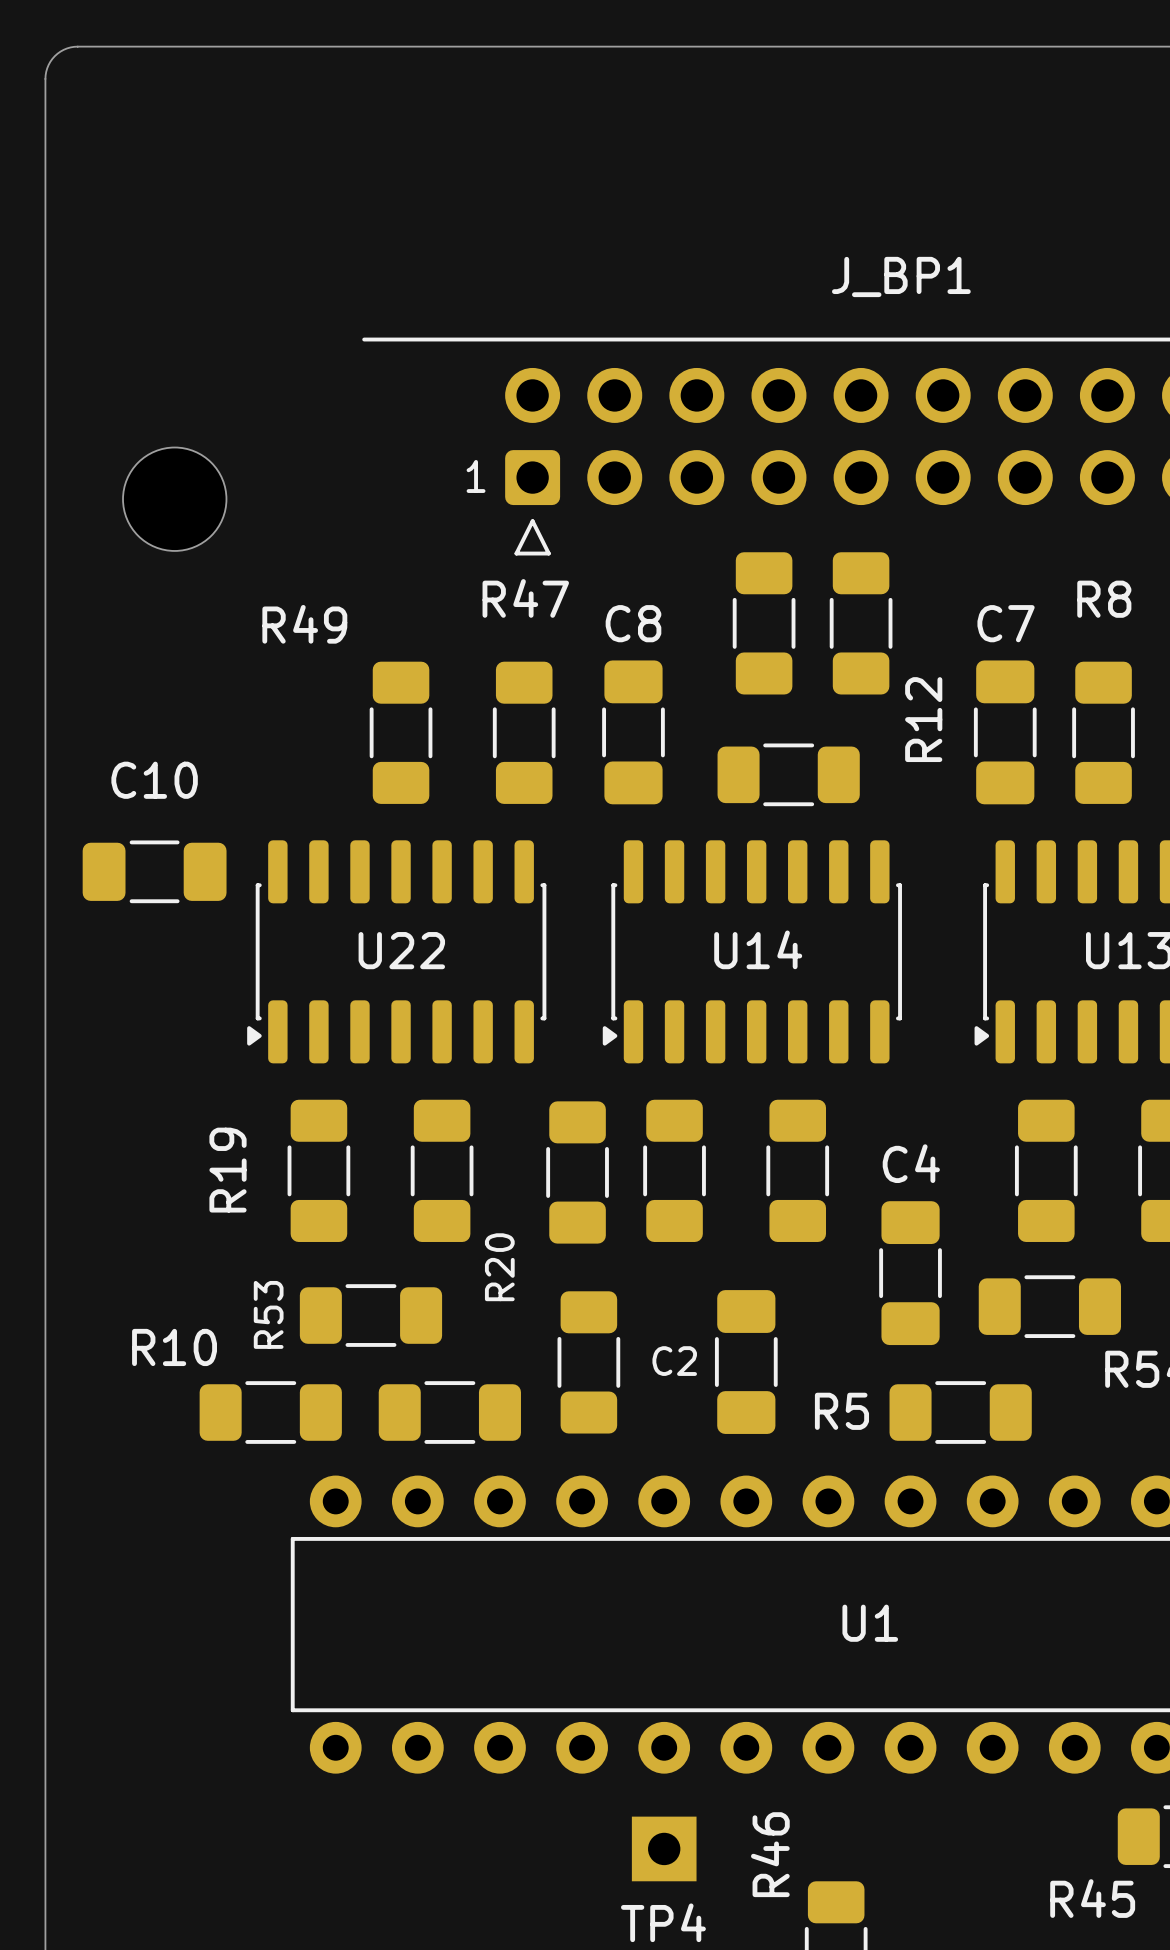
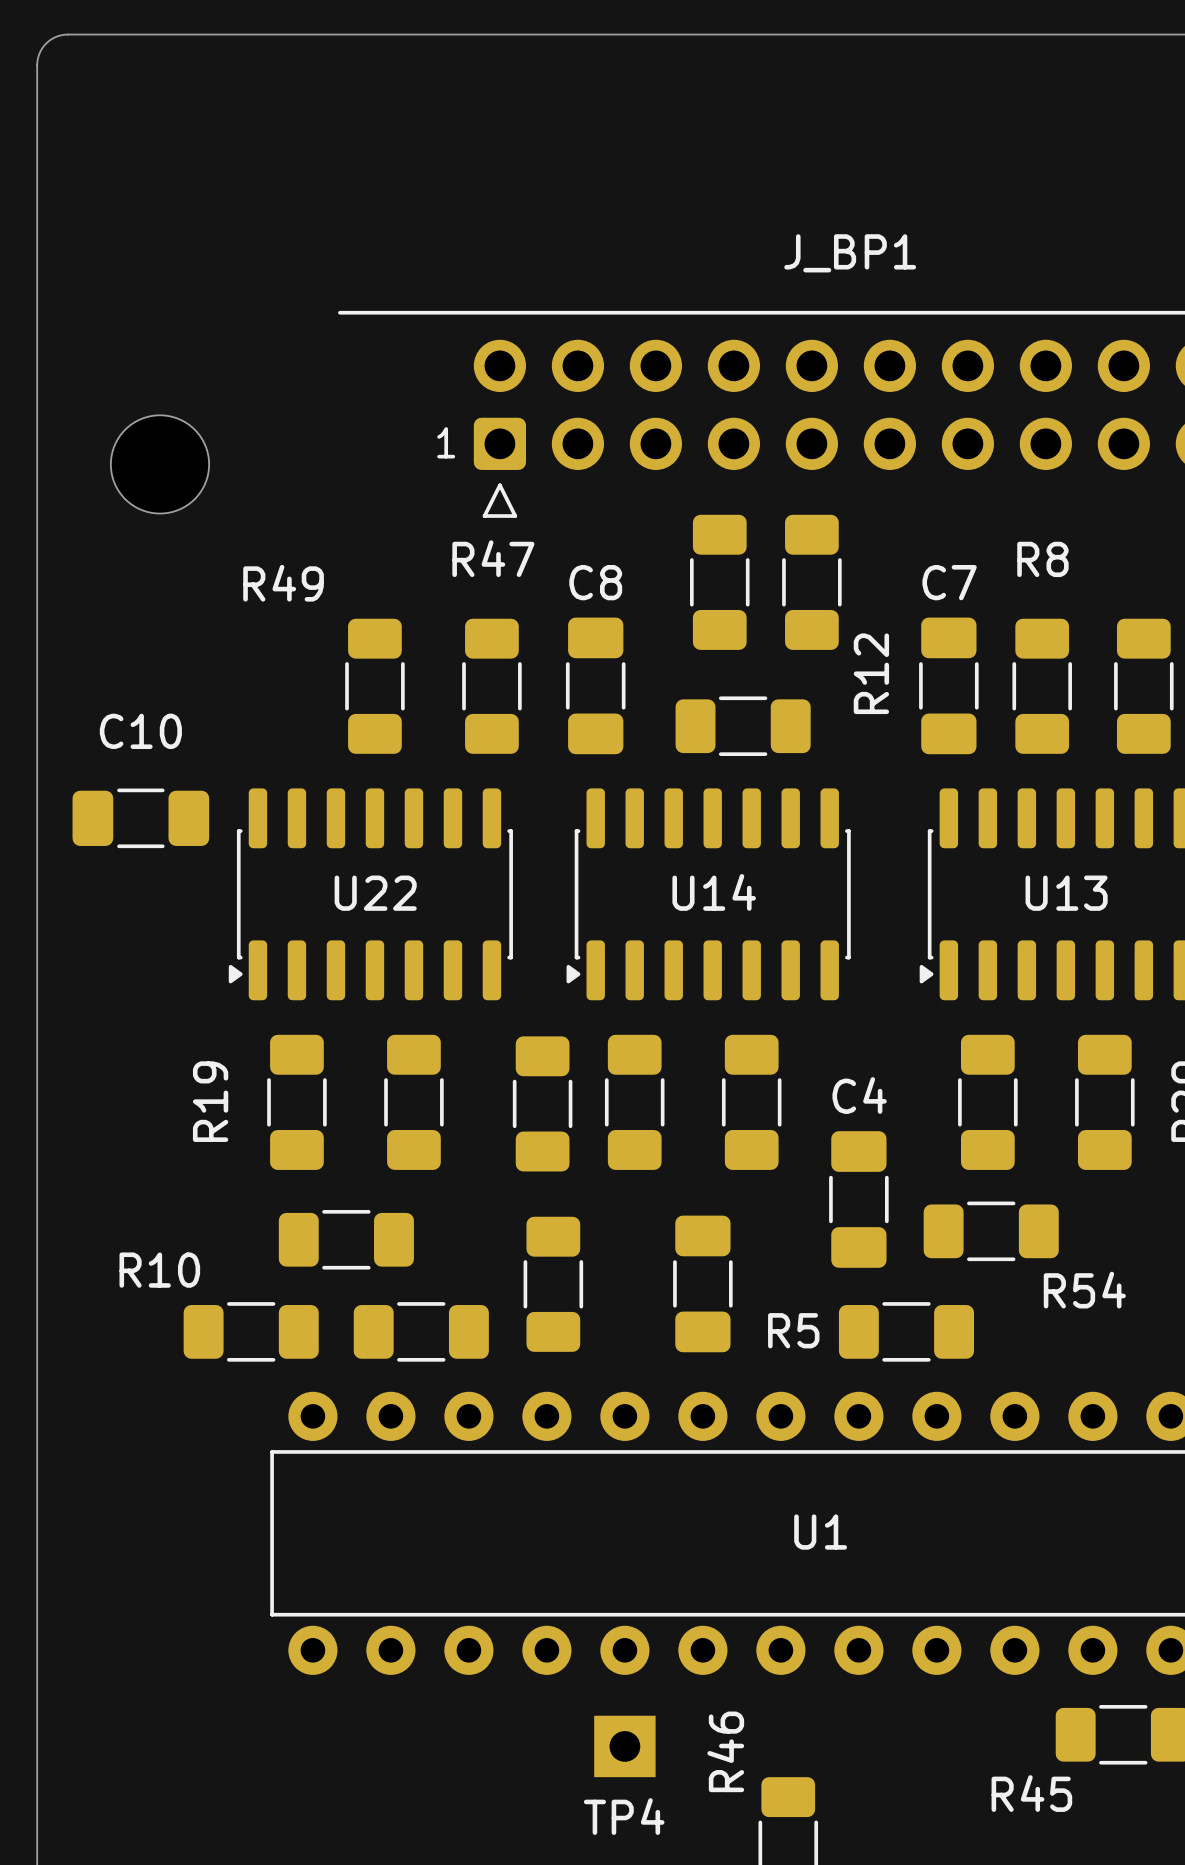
R20 name: R20 (499, 1267) -> none
R53 name: R53 (268, 1314) -> none
C2 name: C2 (674, 1361) -> none

